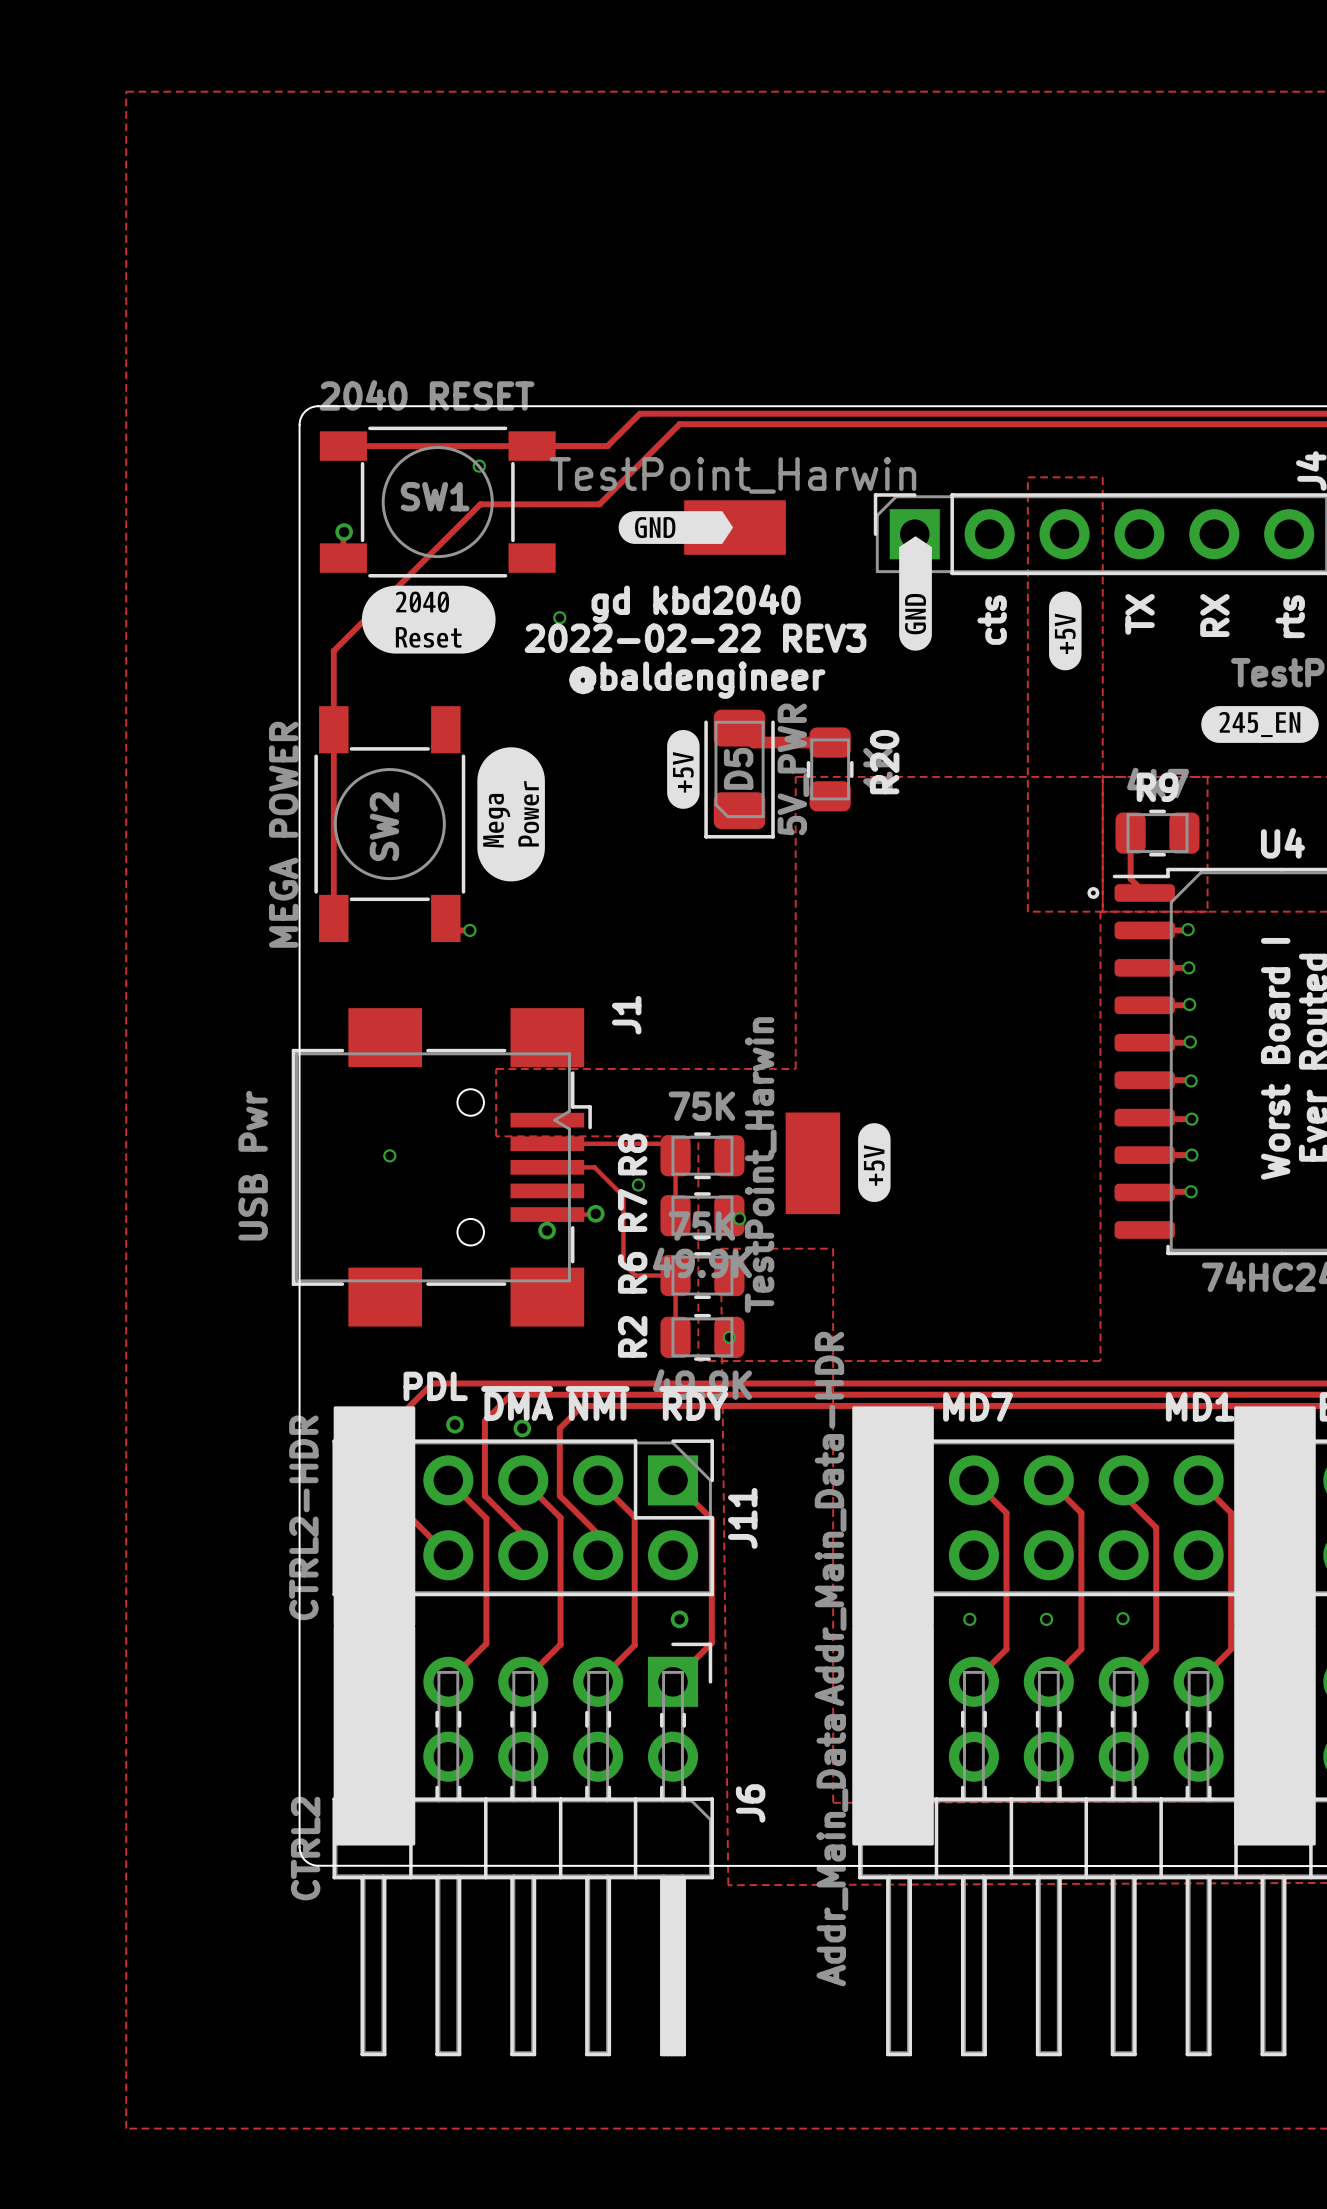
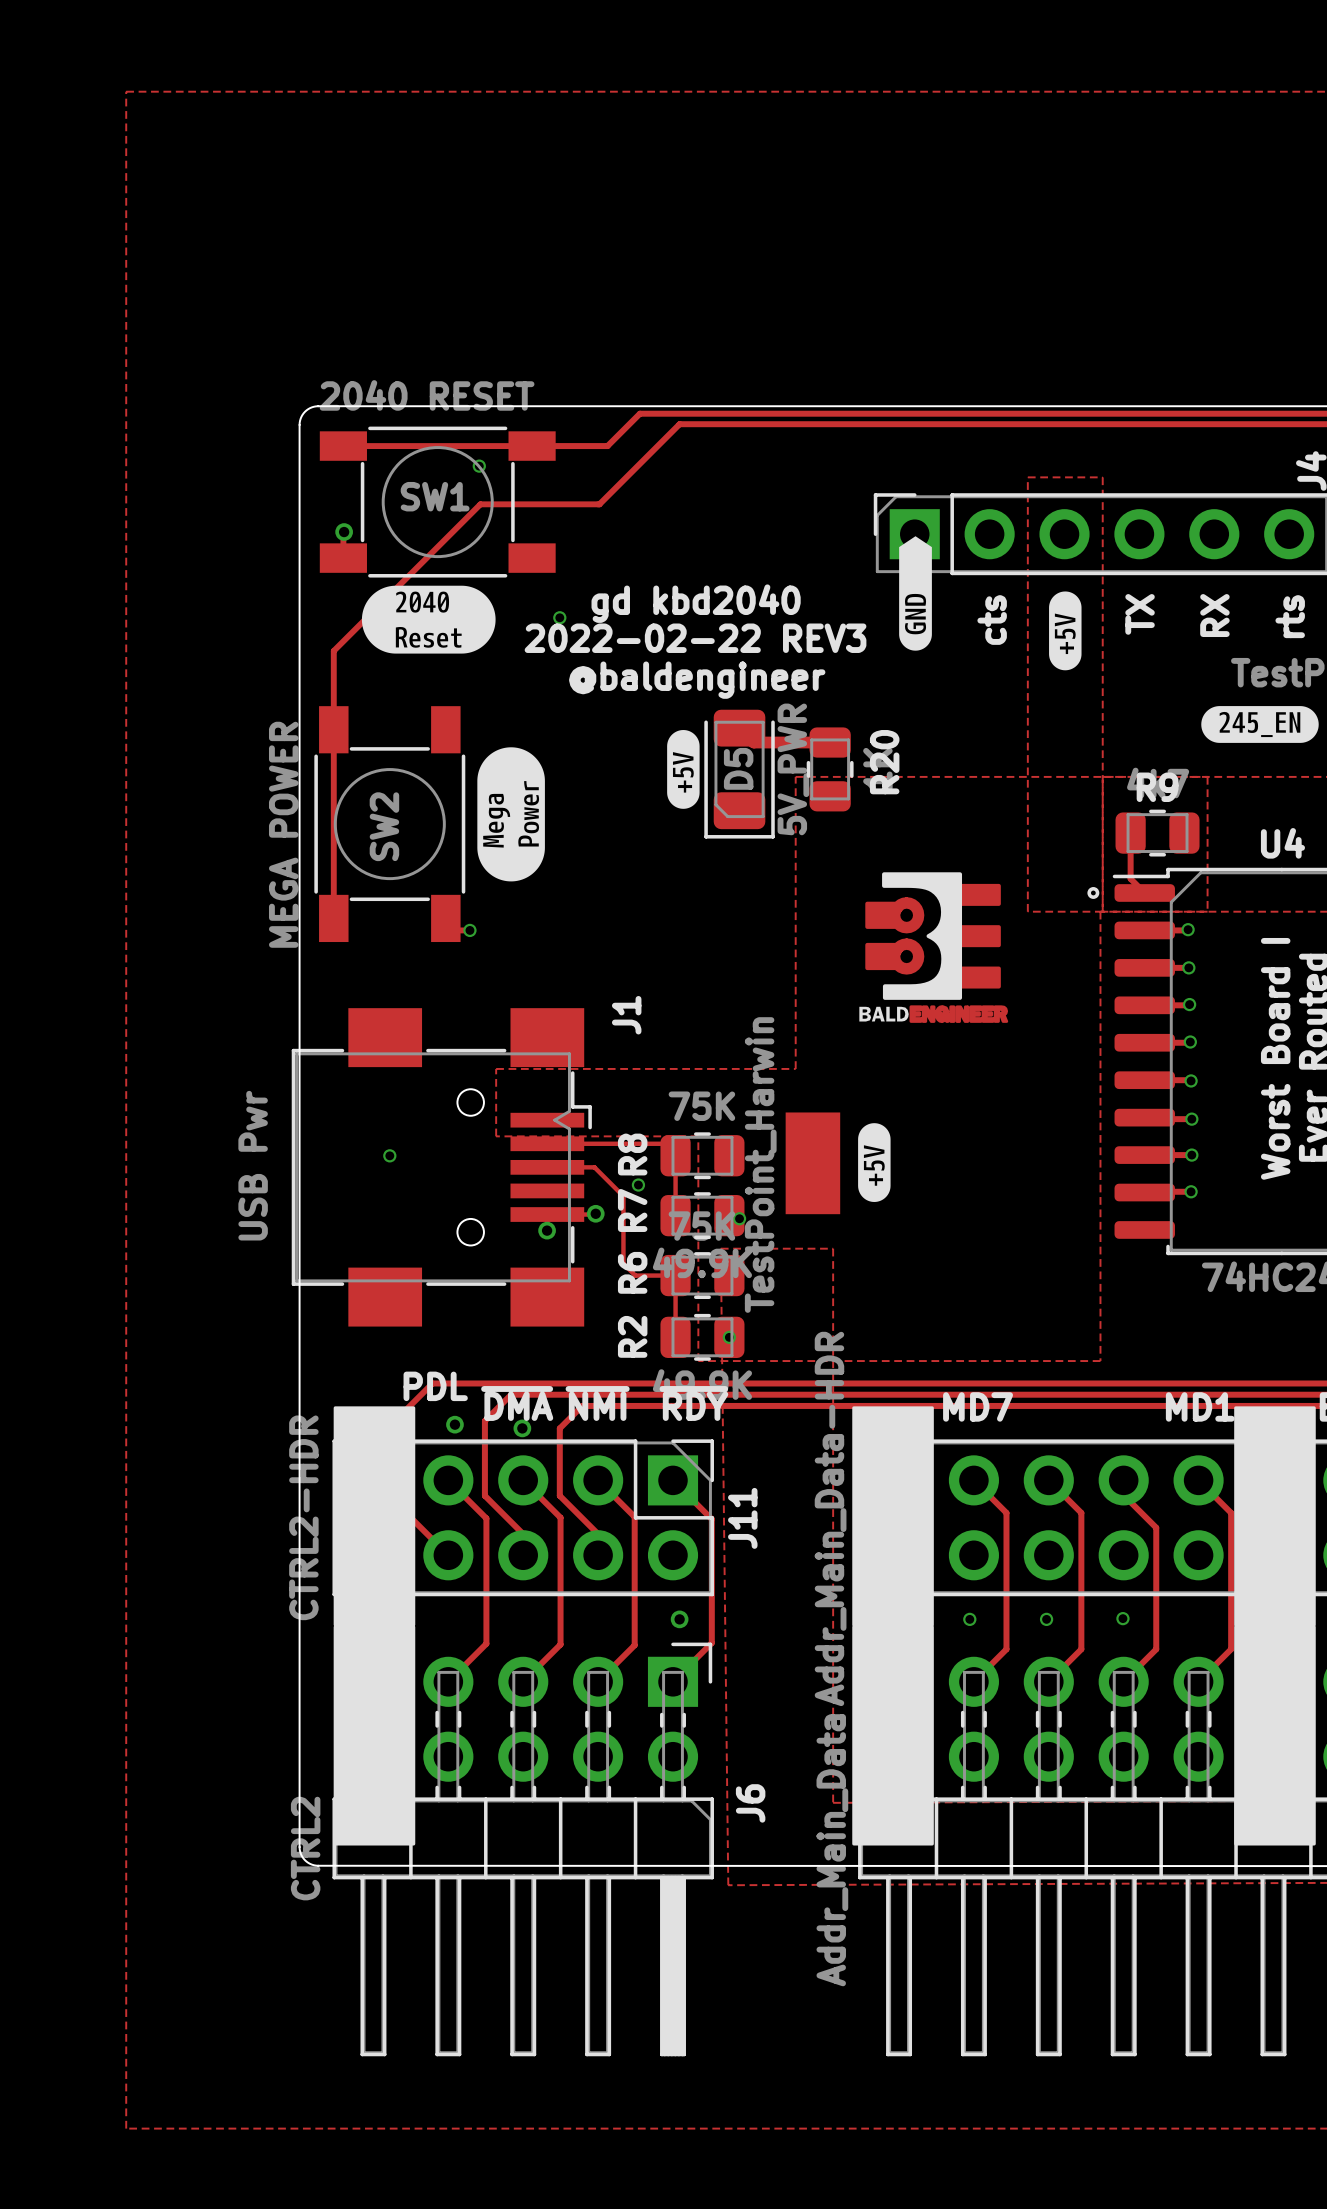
drawing: [618, 511, 734, 544] -> none
part: TestPoint_Harwin (735, 527) -> none
drawing: none -> [859, 872, 1009, 1024]

